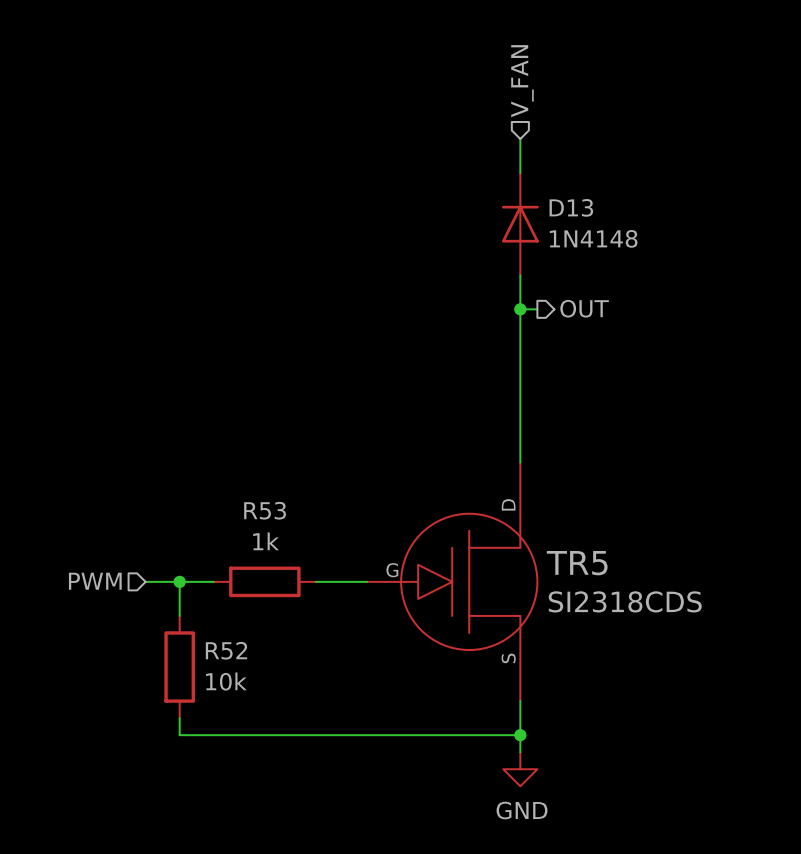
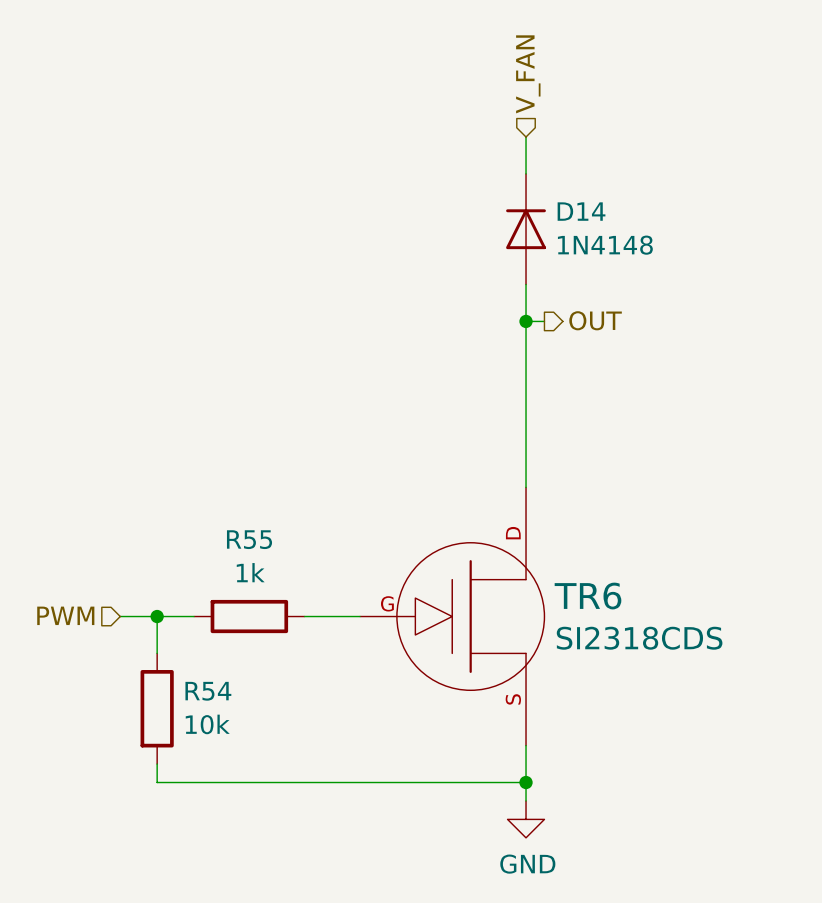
D13 name: D13 (571, 207) -> D14 (581, 211)
R53 name: R53 (265, 510) -> R55 (249, 539)
TR5 name: TR5 (577, 563) -> TR6 (588, 596)
R52 name: R52 (226, 650) -> R54 (208, 691)

